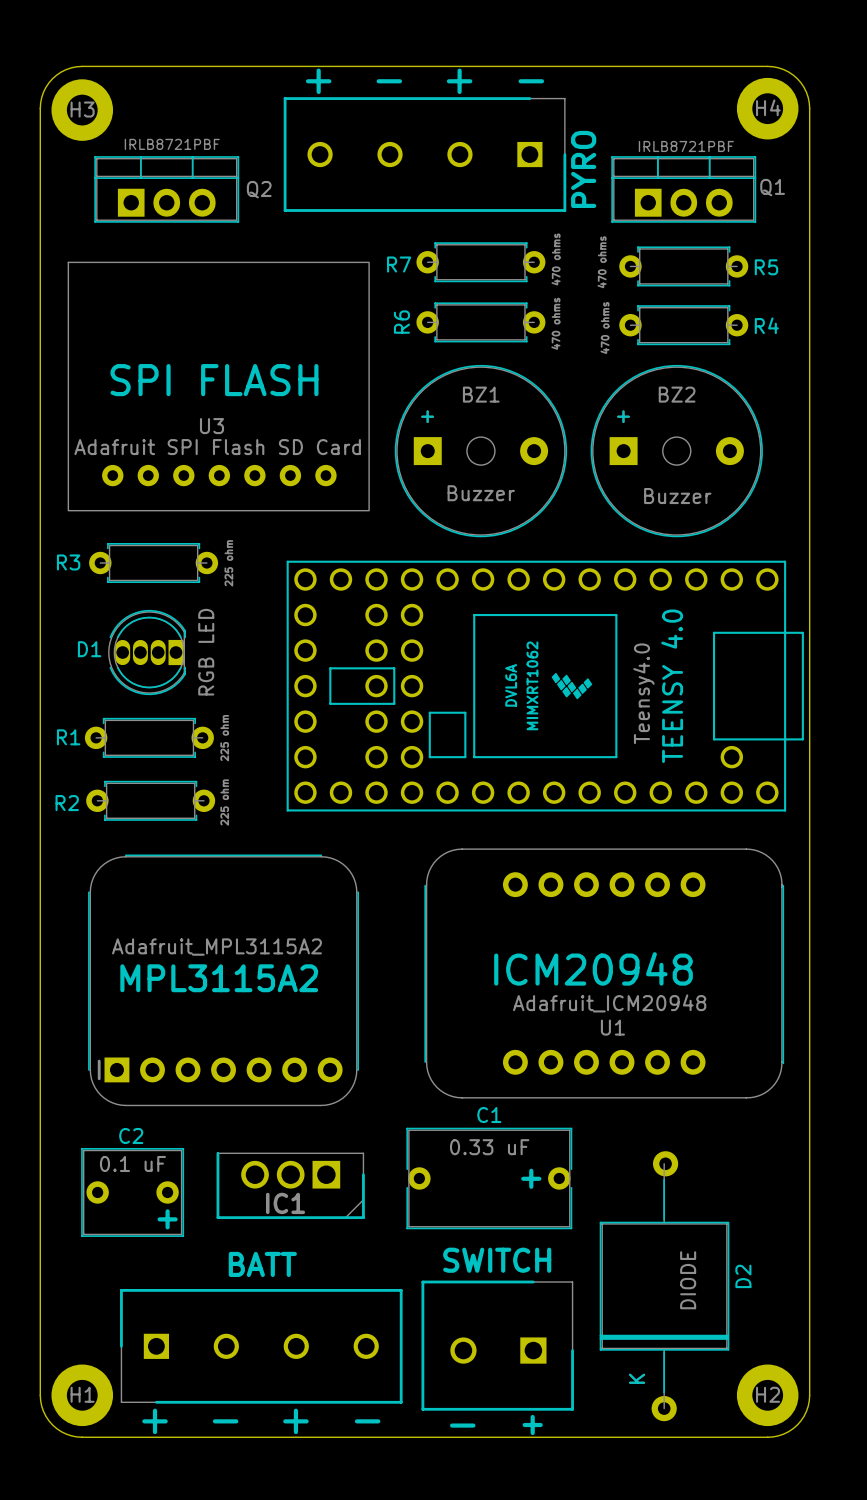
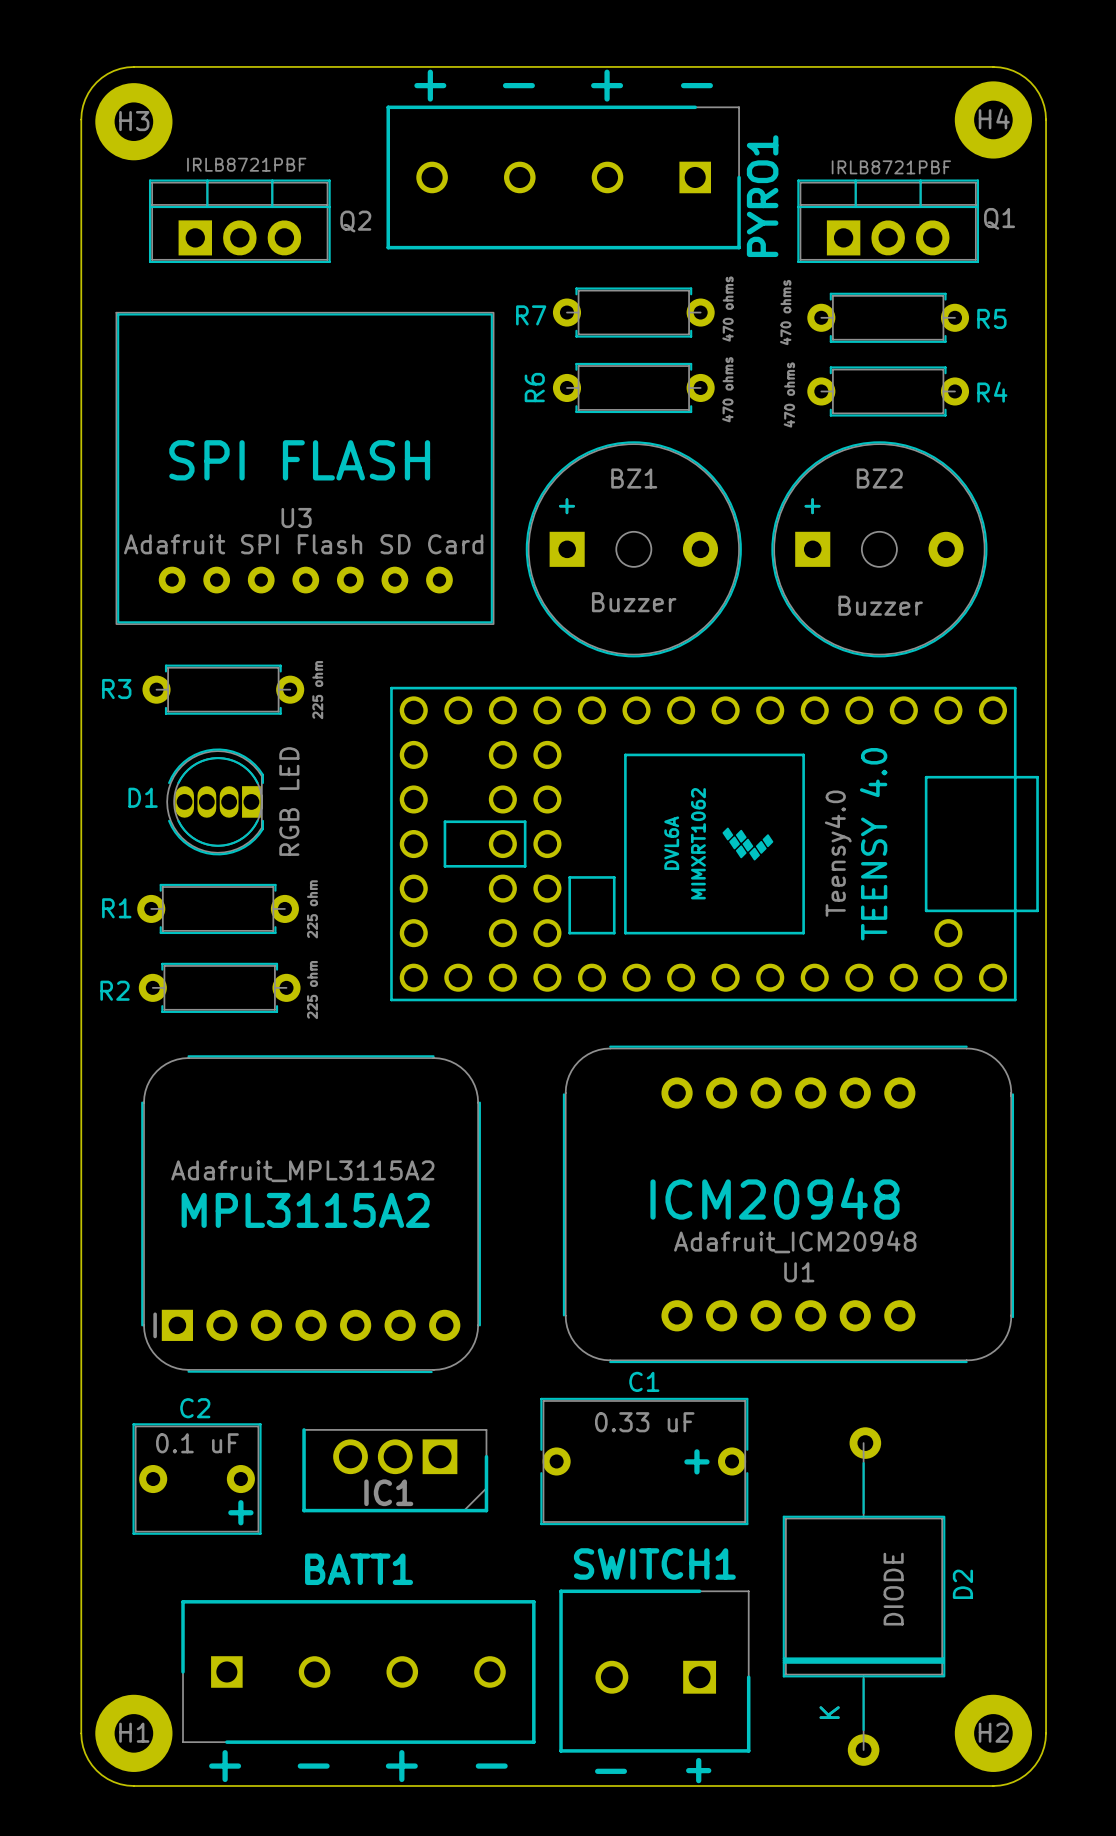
PYRO name: PYRO (583, 169) -> PYRO1 (762, 196)
U3 footprint: [67, 261, 370, 512] -> [115, 311, 495, 625]
U1 footprint: [424, 848, 785, 1099] -> [562, 1045, 1015, 1364]
part footprint: [88, 854, 360, 1107] -> [141, 1055, 481, 1374]
SWITCH name: SWITCH (497, 1260) -> SWITCH1 (654, 1563)
BATT name: BATT (262, 1264) -> BATT1 (359, 1569)

